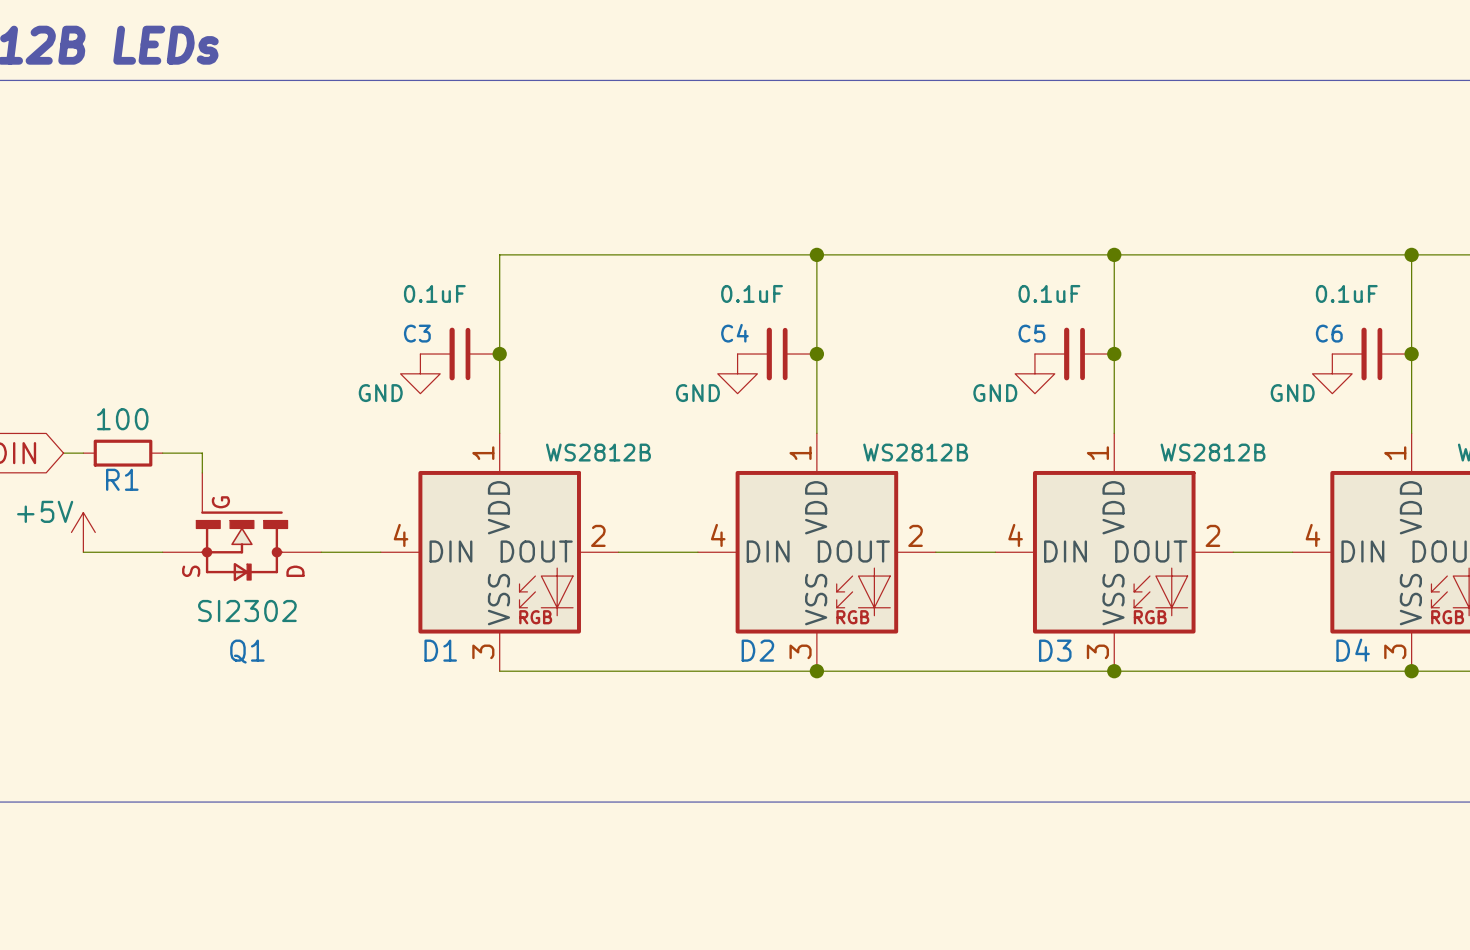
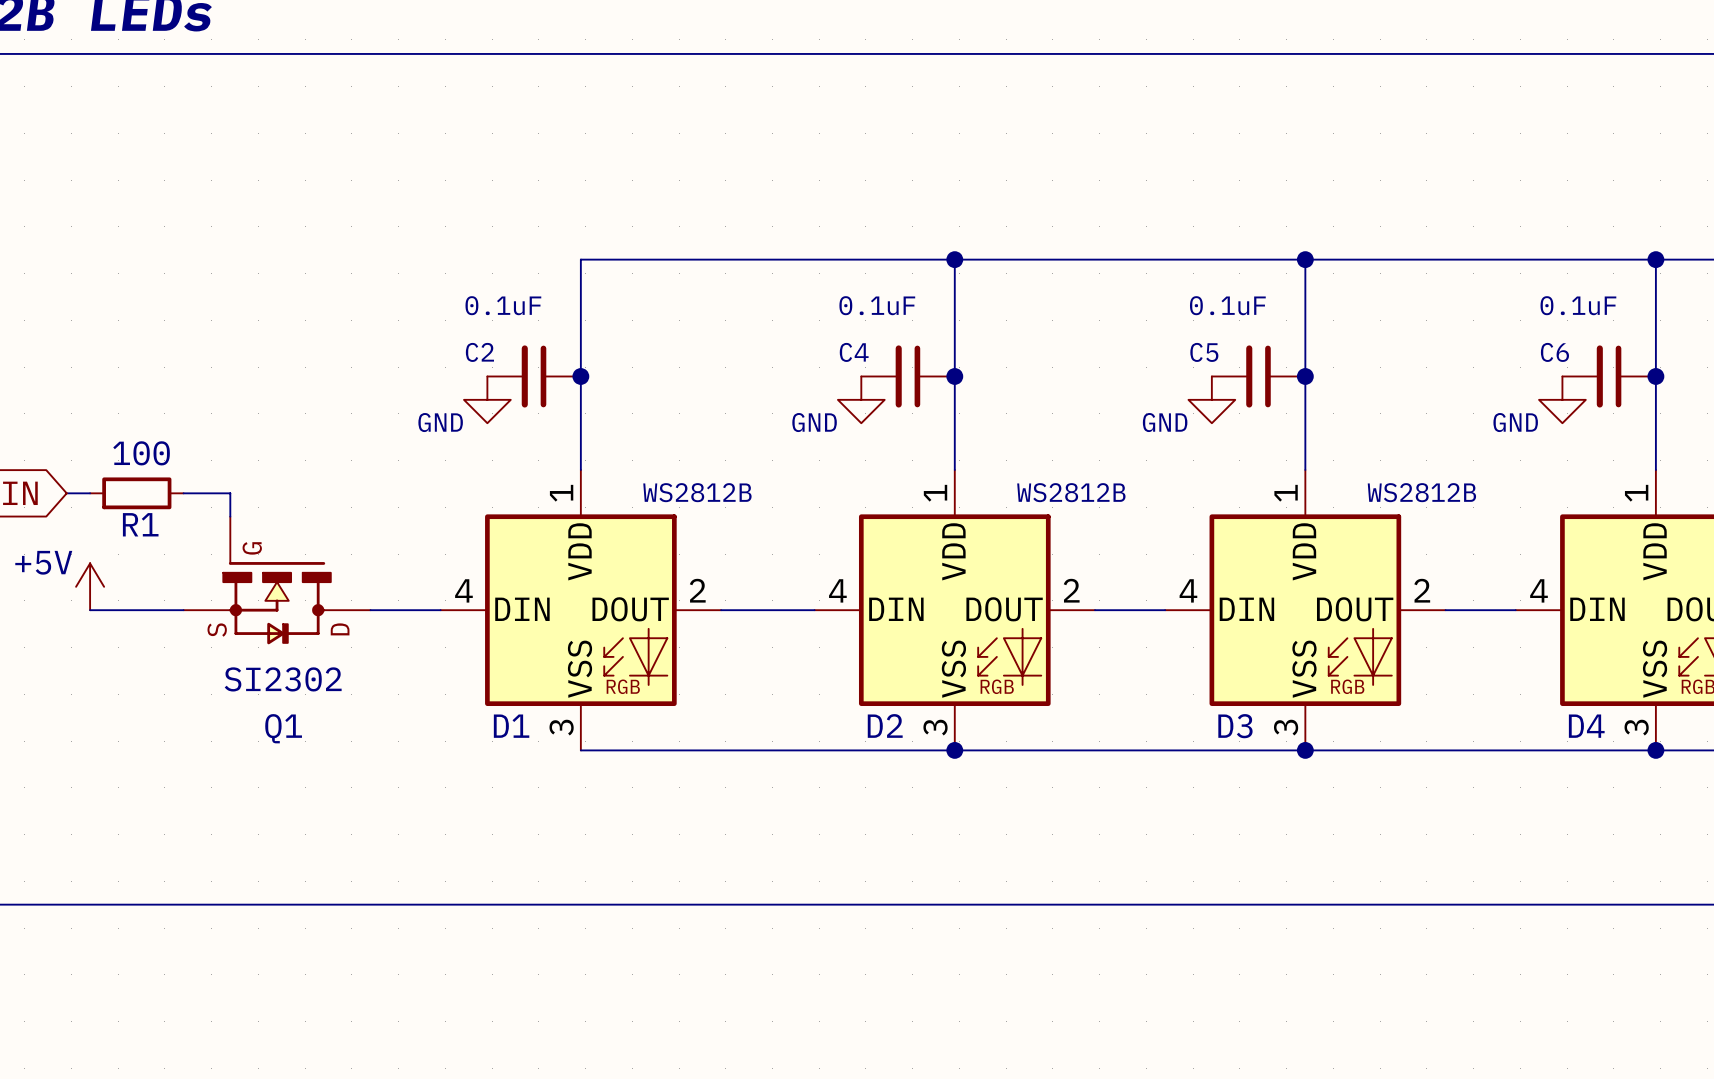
C3 name: C3 (417, 333) -> C2 (479, 352)

